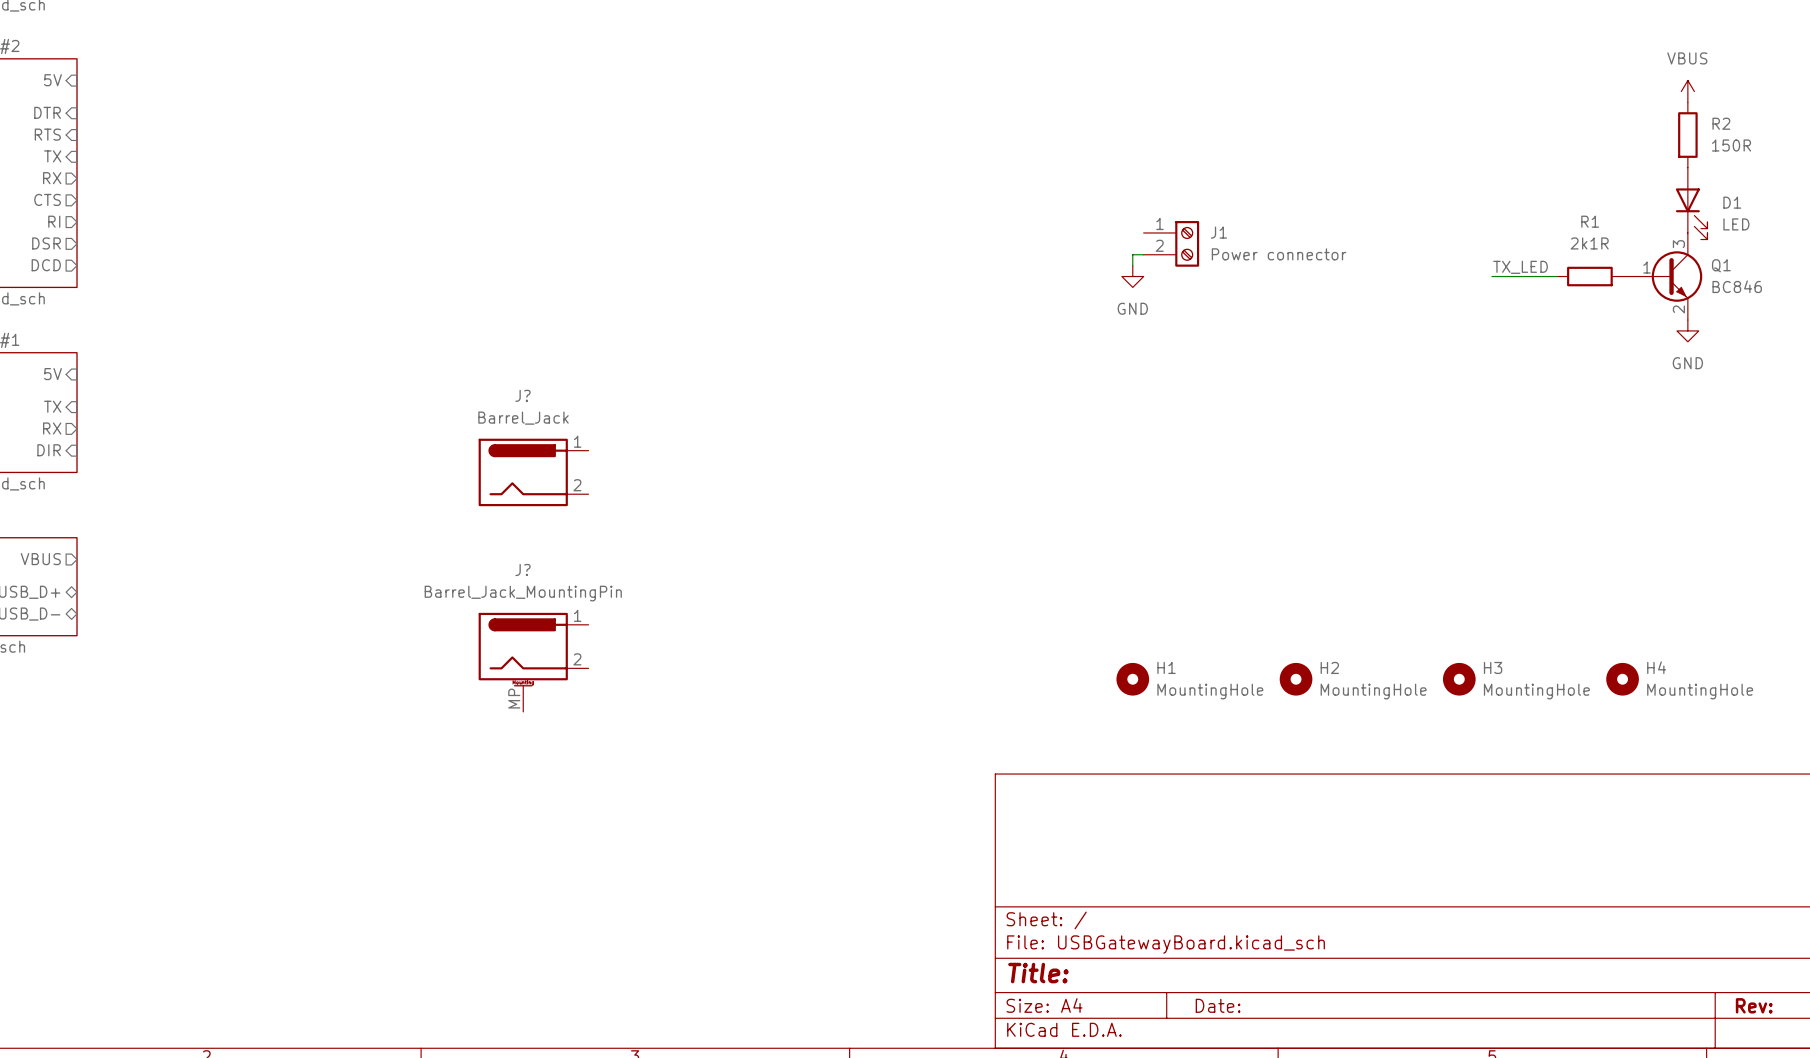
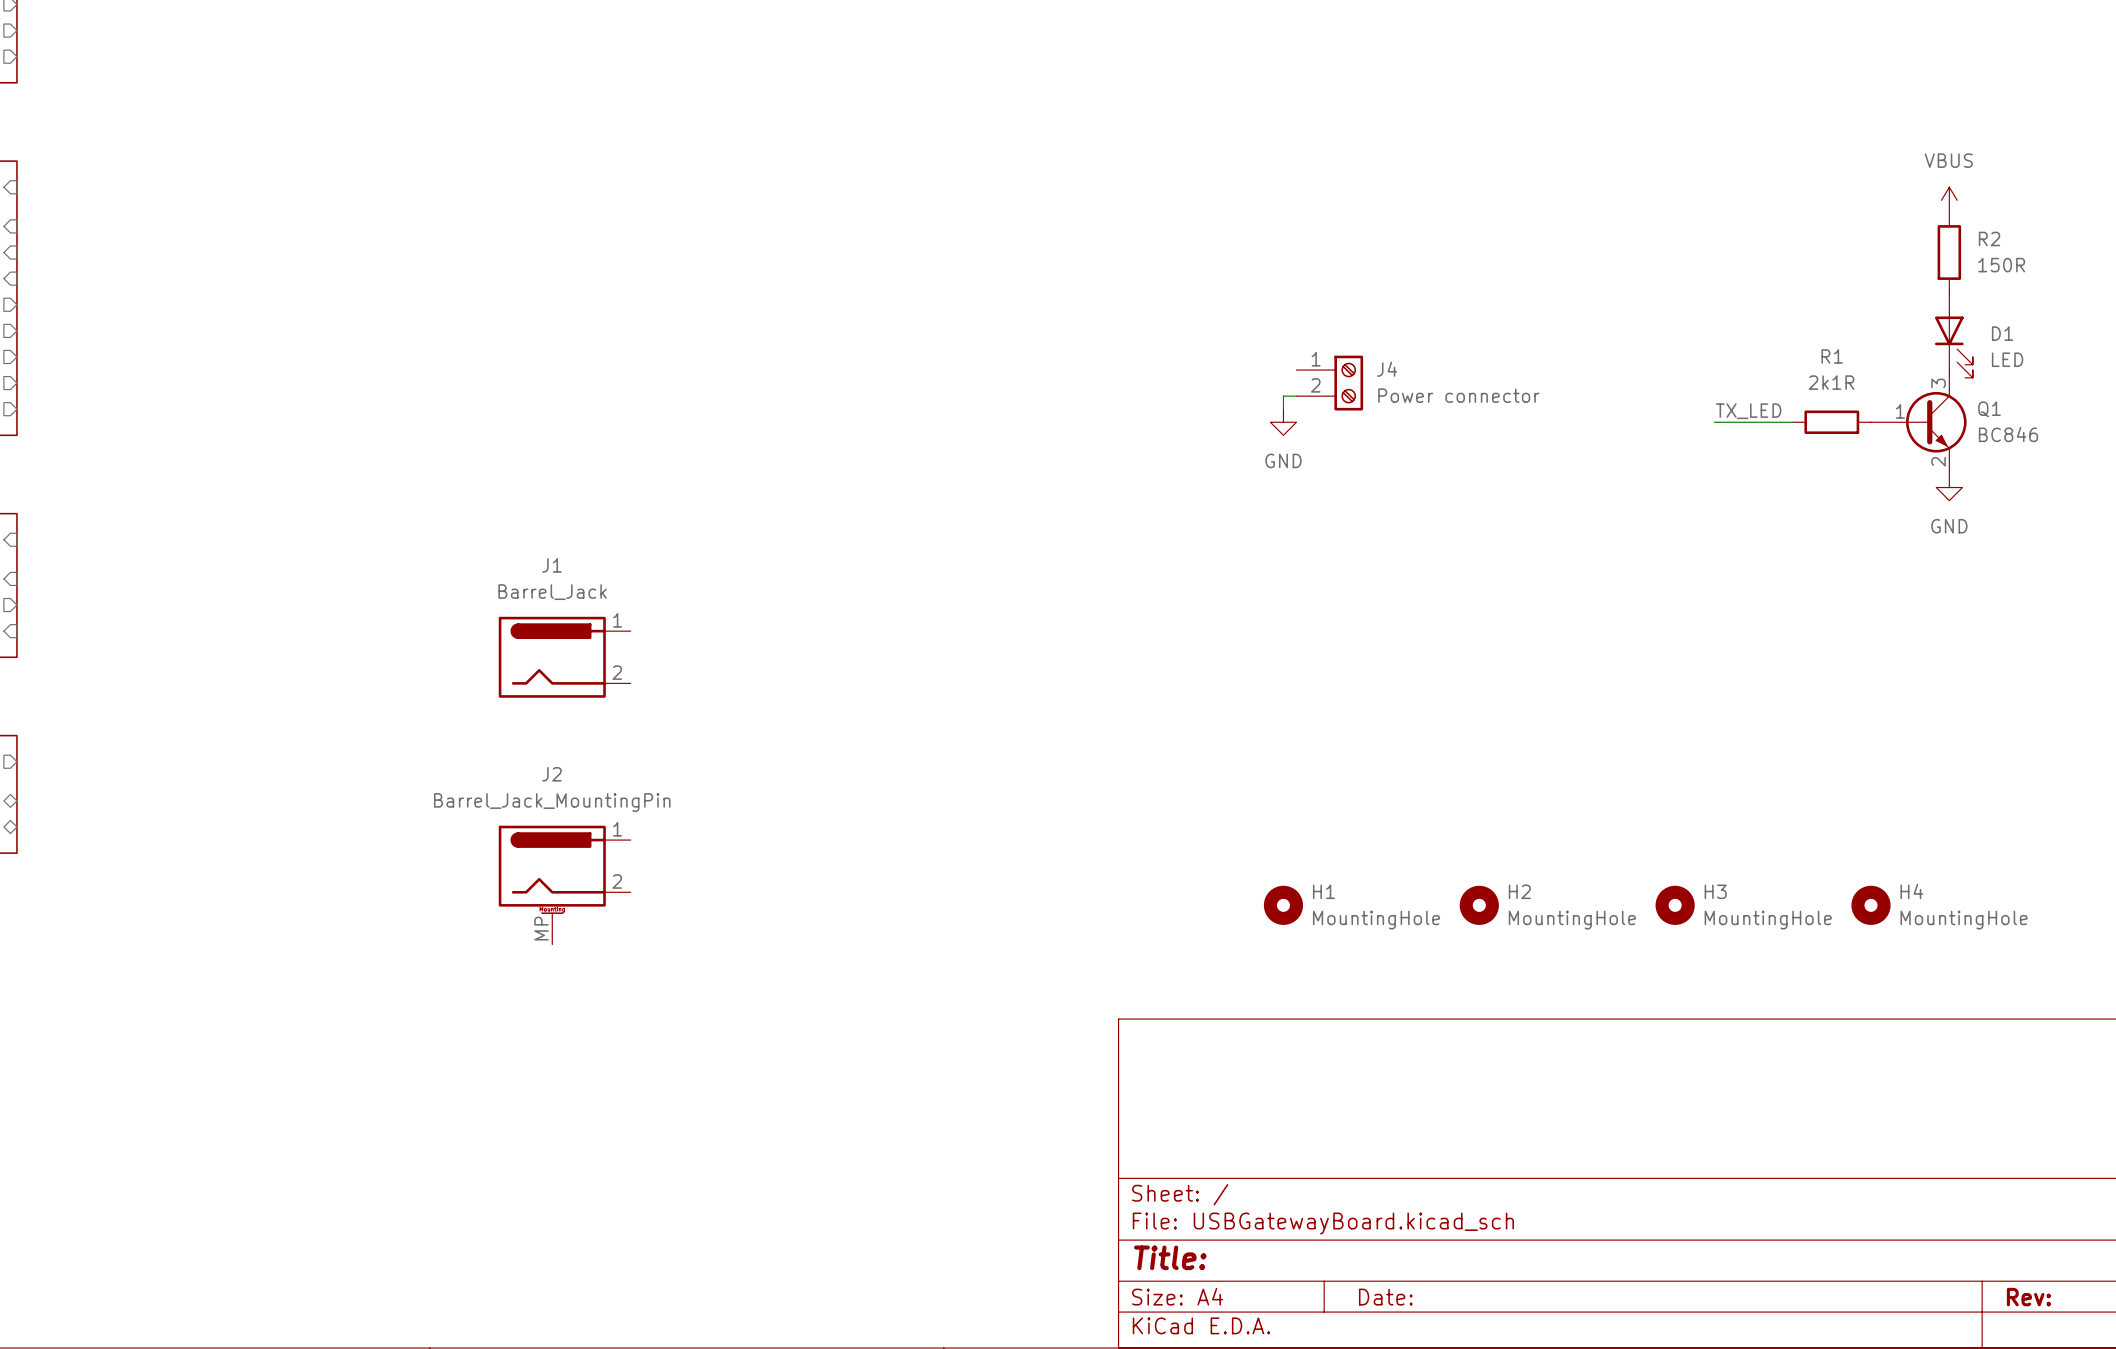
J1 name: J1 (1218, 232) -> J4 (1387, 369)
J? name: J? (523, 395) -> J1 (551, 565)
J? name: J? (523, 569) -> J2 (551, 774)

